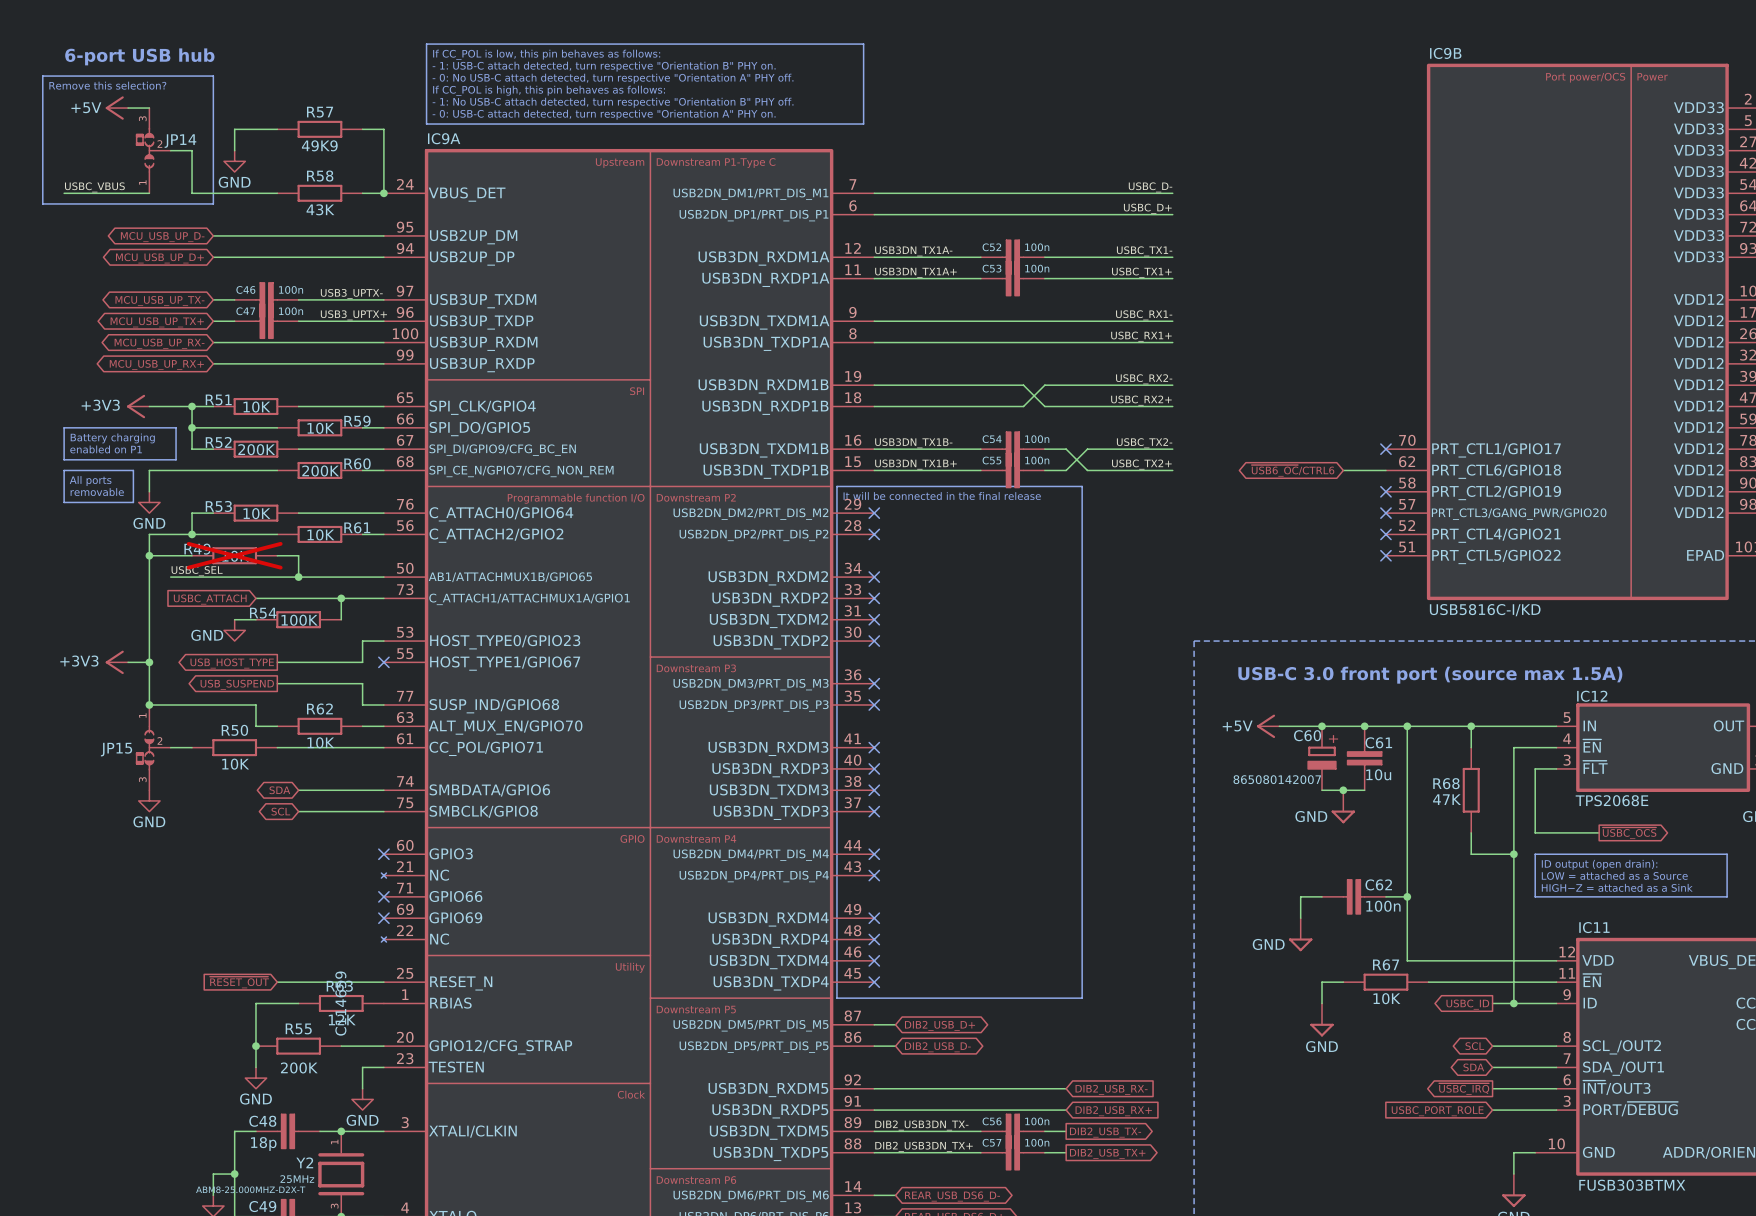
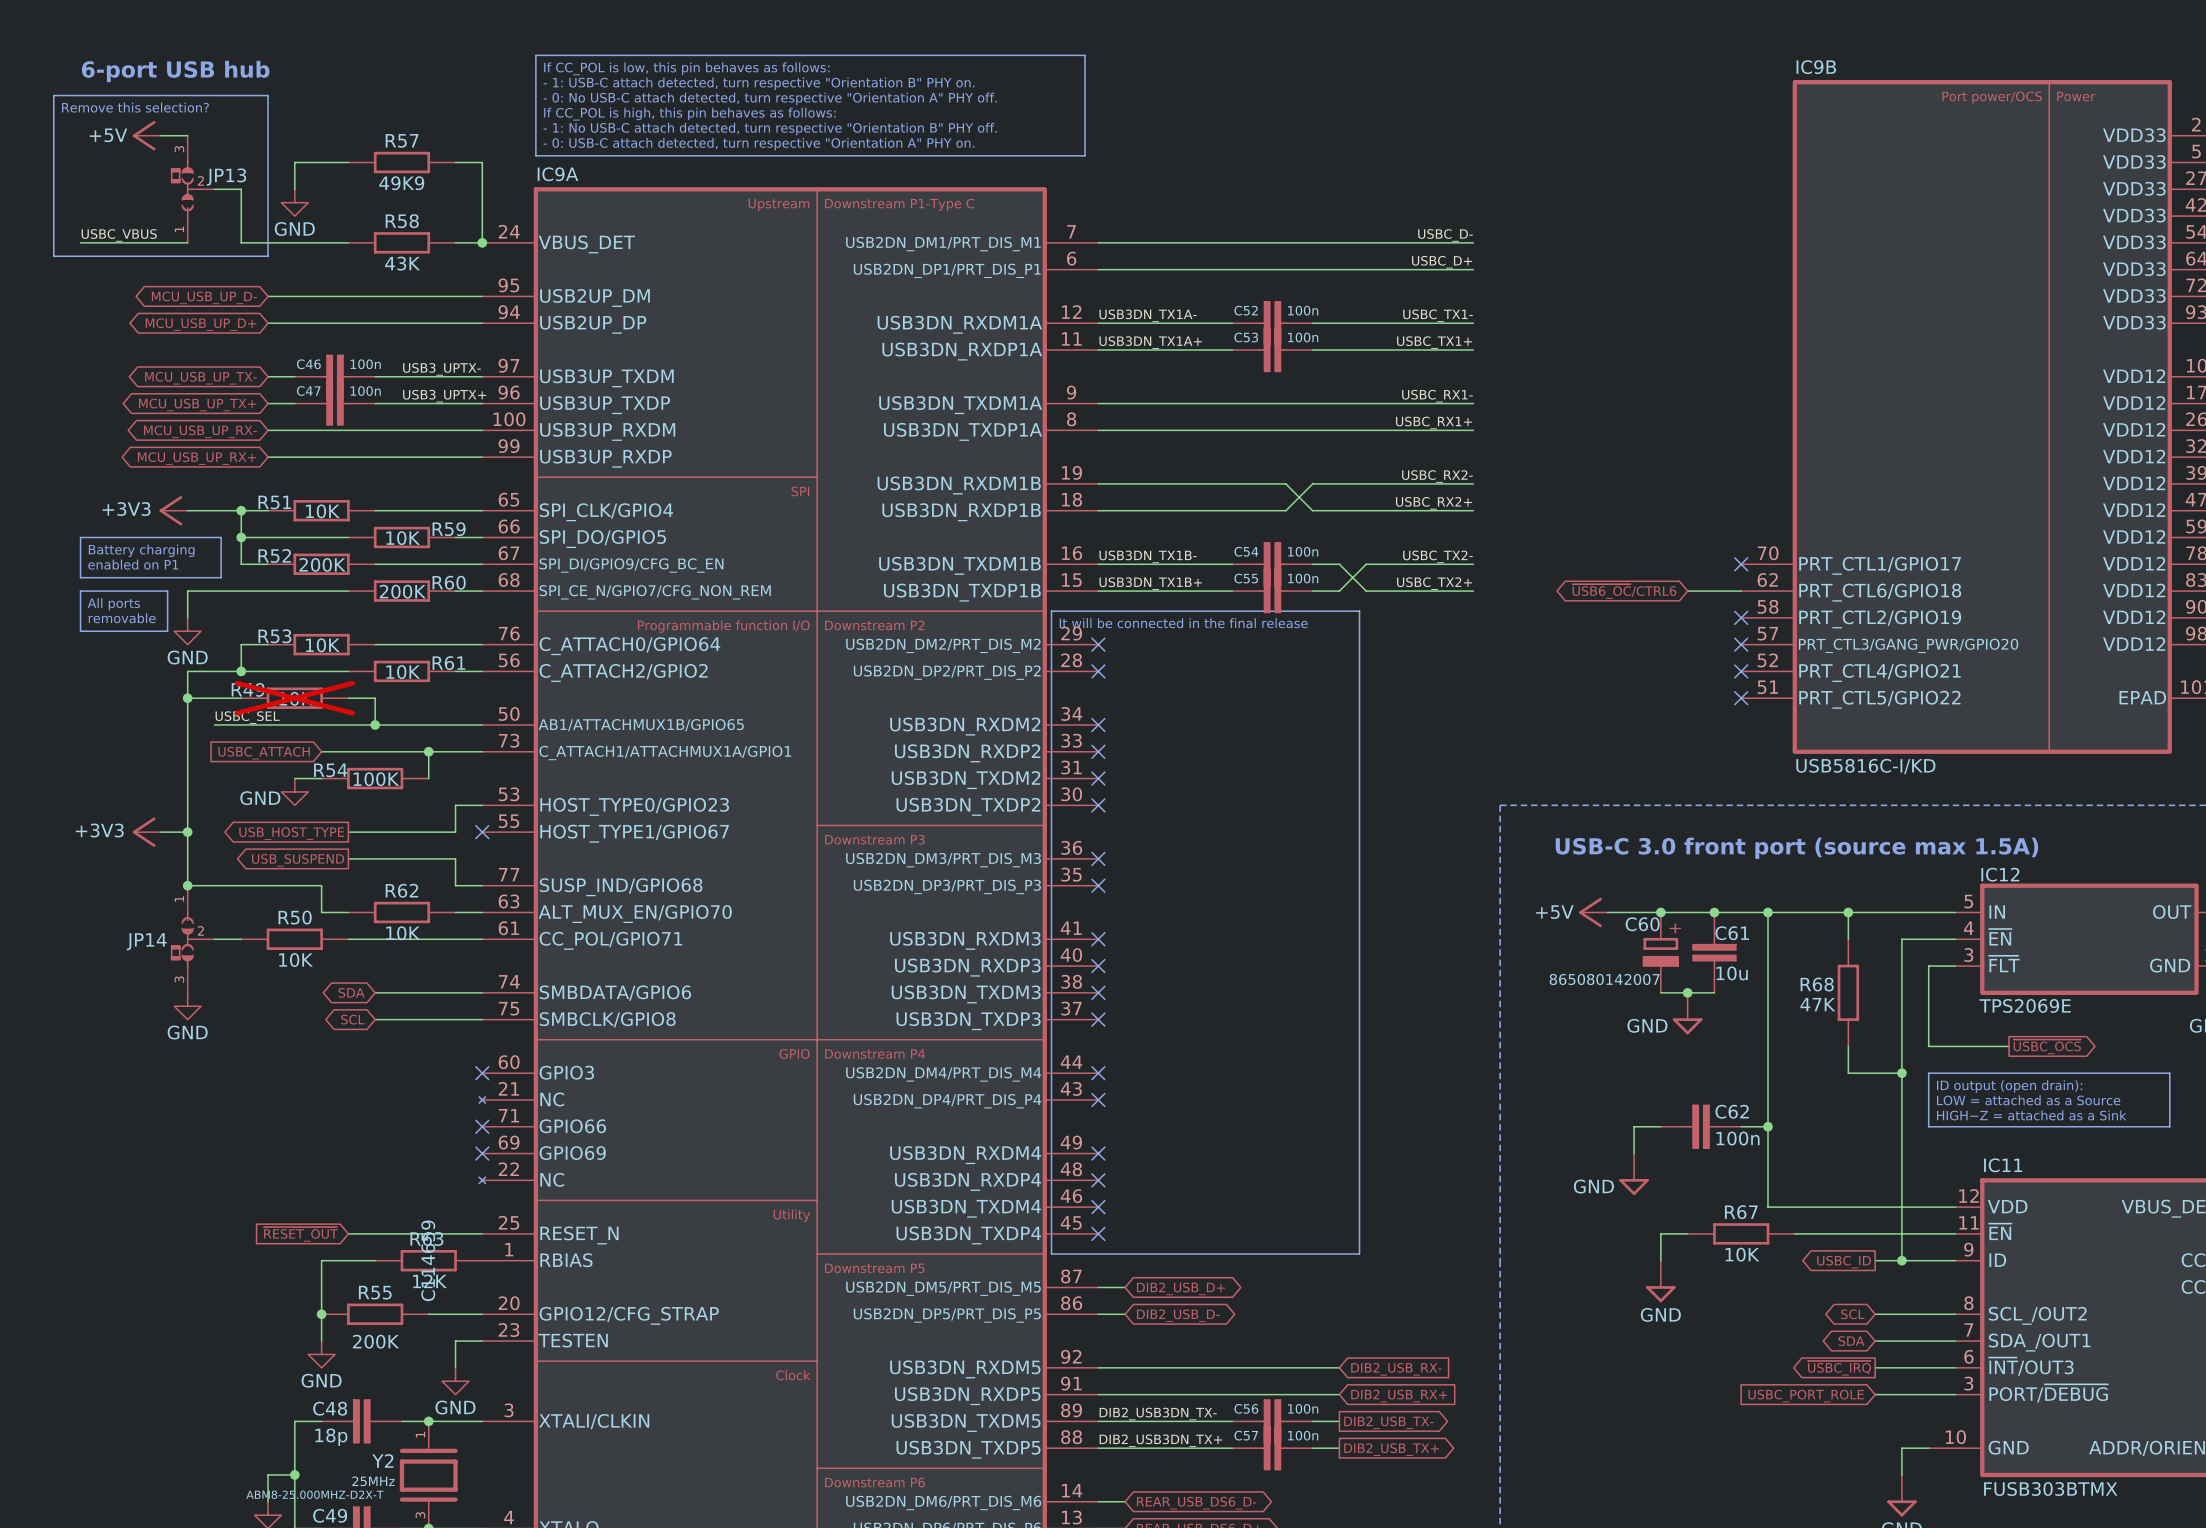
JP14 name: JP14 (180, 141) -> JP13 (226, 177)
JP15 name: JP15 (116, 749) -> JP14 (146, 941)
IC12 value: TPS2068E (1611, 800) -> TPS2069E (2025, 1005)

